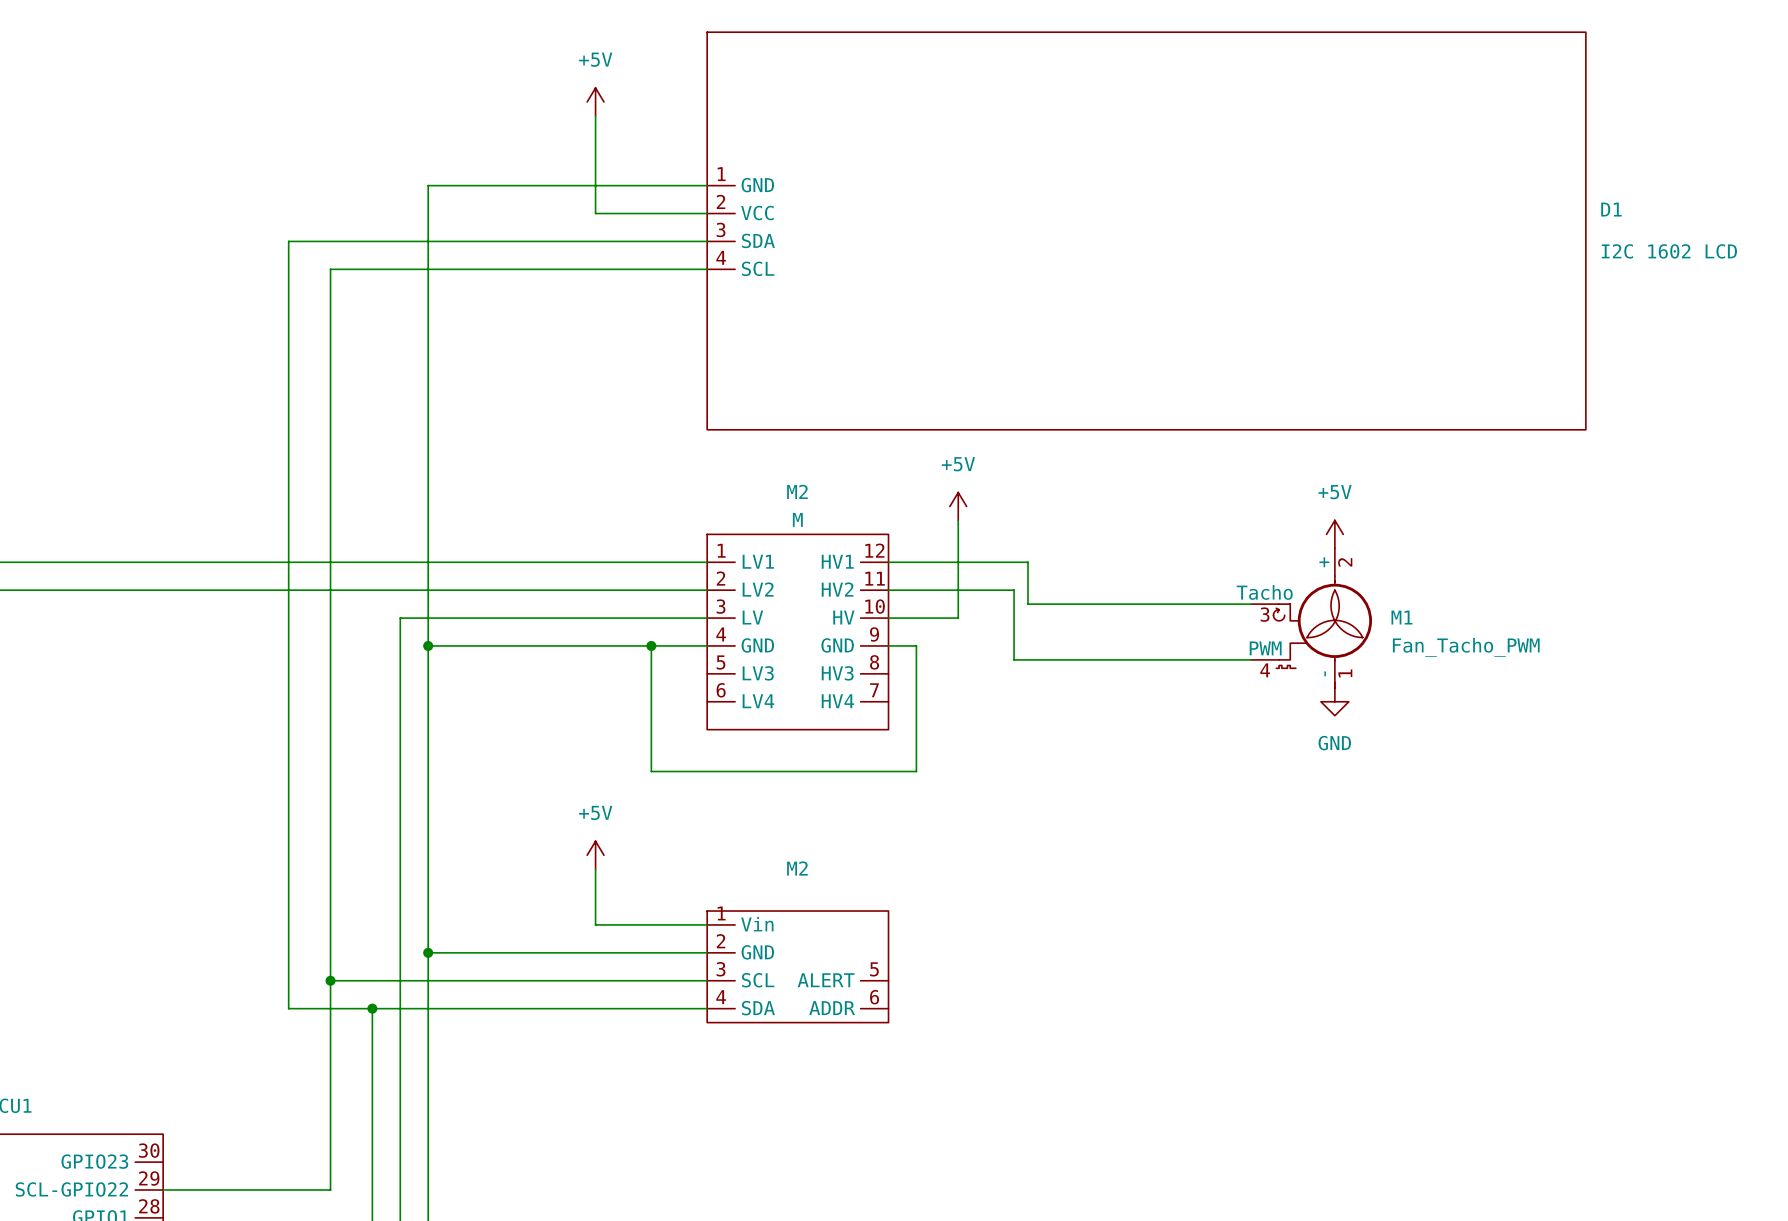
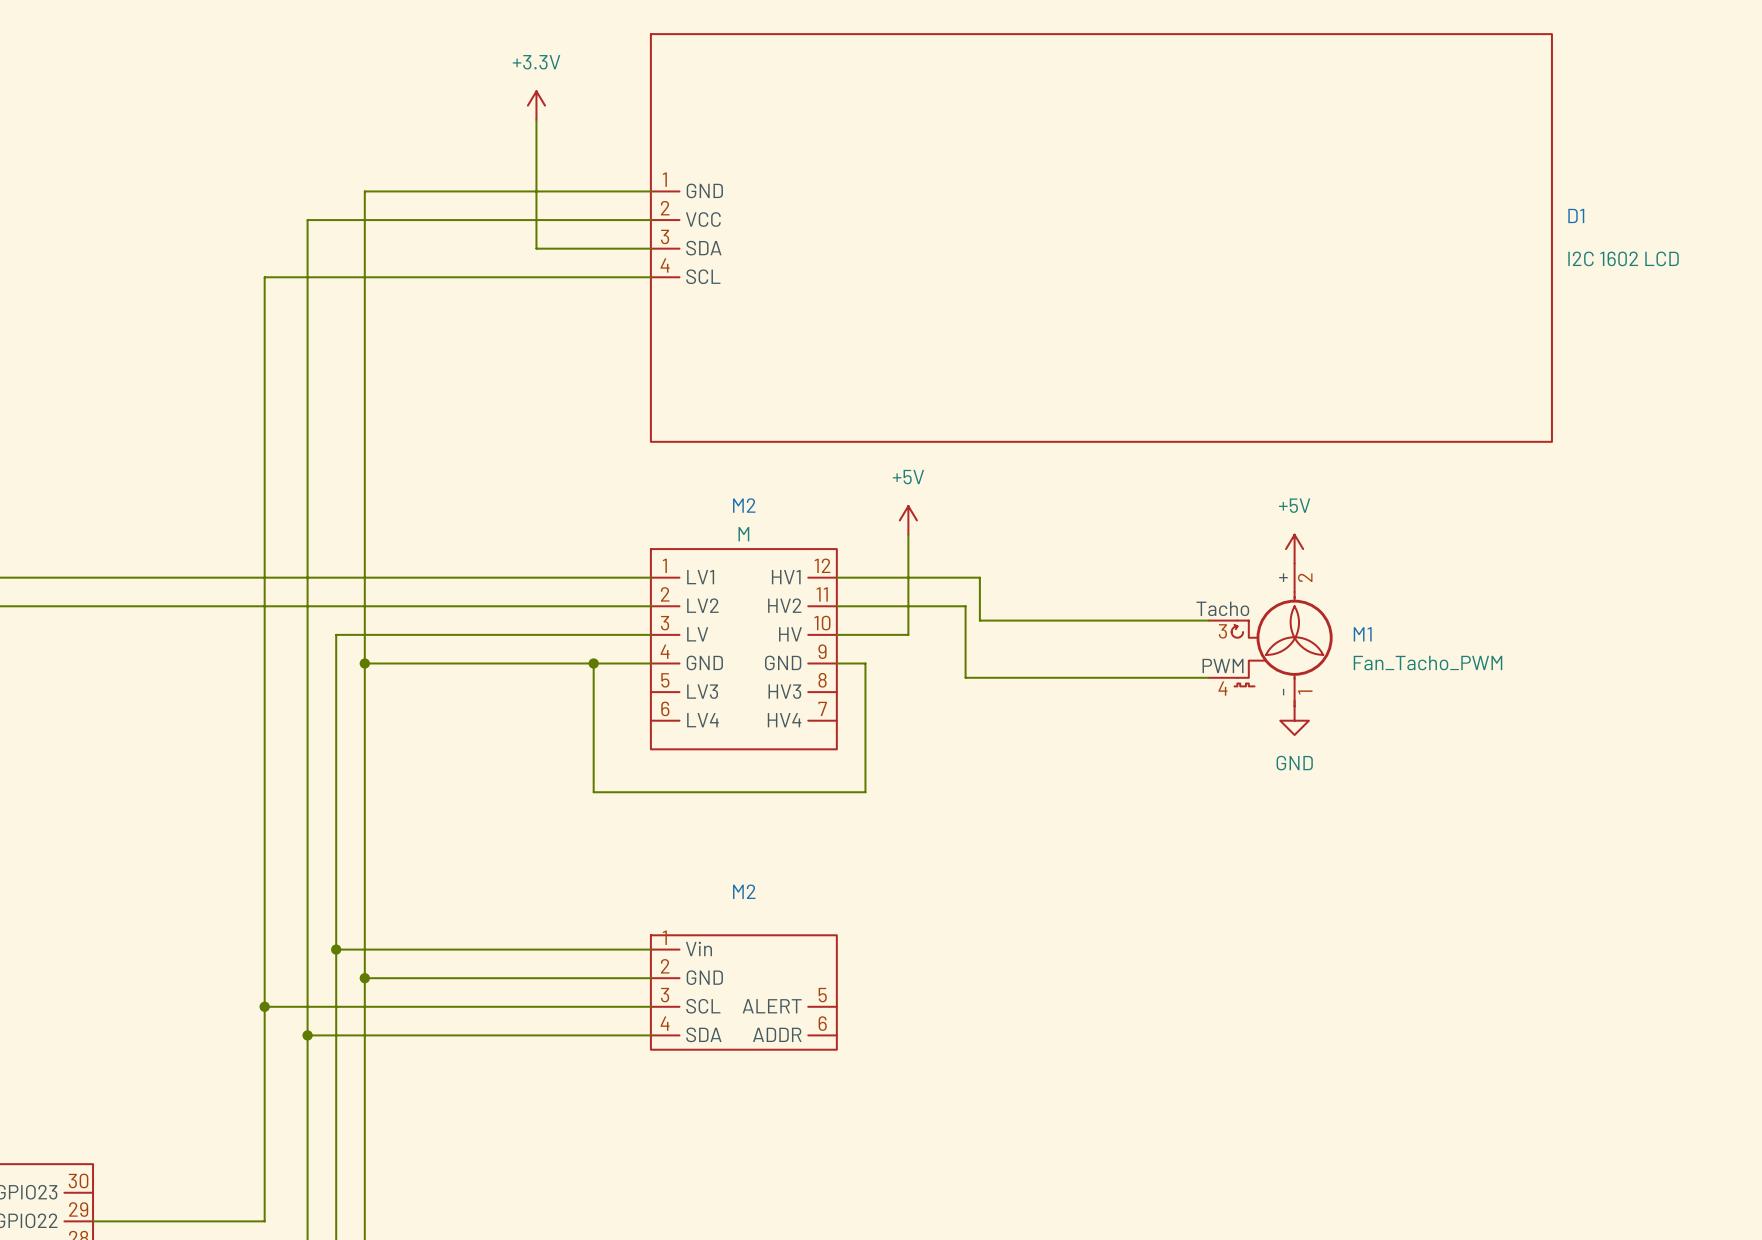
power symbol: +5V (595, 101) -> +3.3V (536, 105)
wire: (595, 241) (288, 241) (288, 1008) (372, 1008) -> (536, 248) (536, 220) (307, 220) (307, 1035)
power symbol: +5V (595, 855) -> none
wire: (595, 869) (595, 924) -> (336, 949) (536, 949)
junction: none -> (336, 949)

